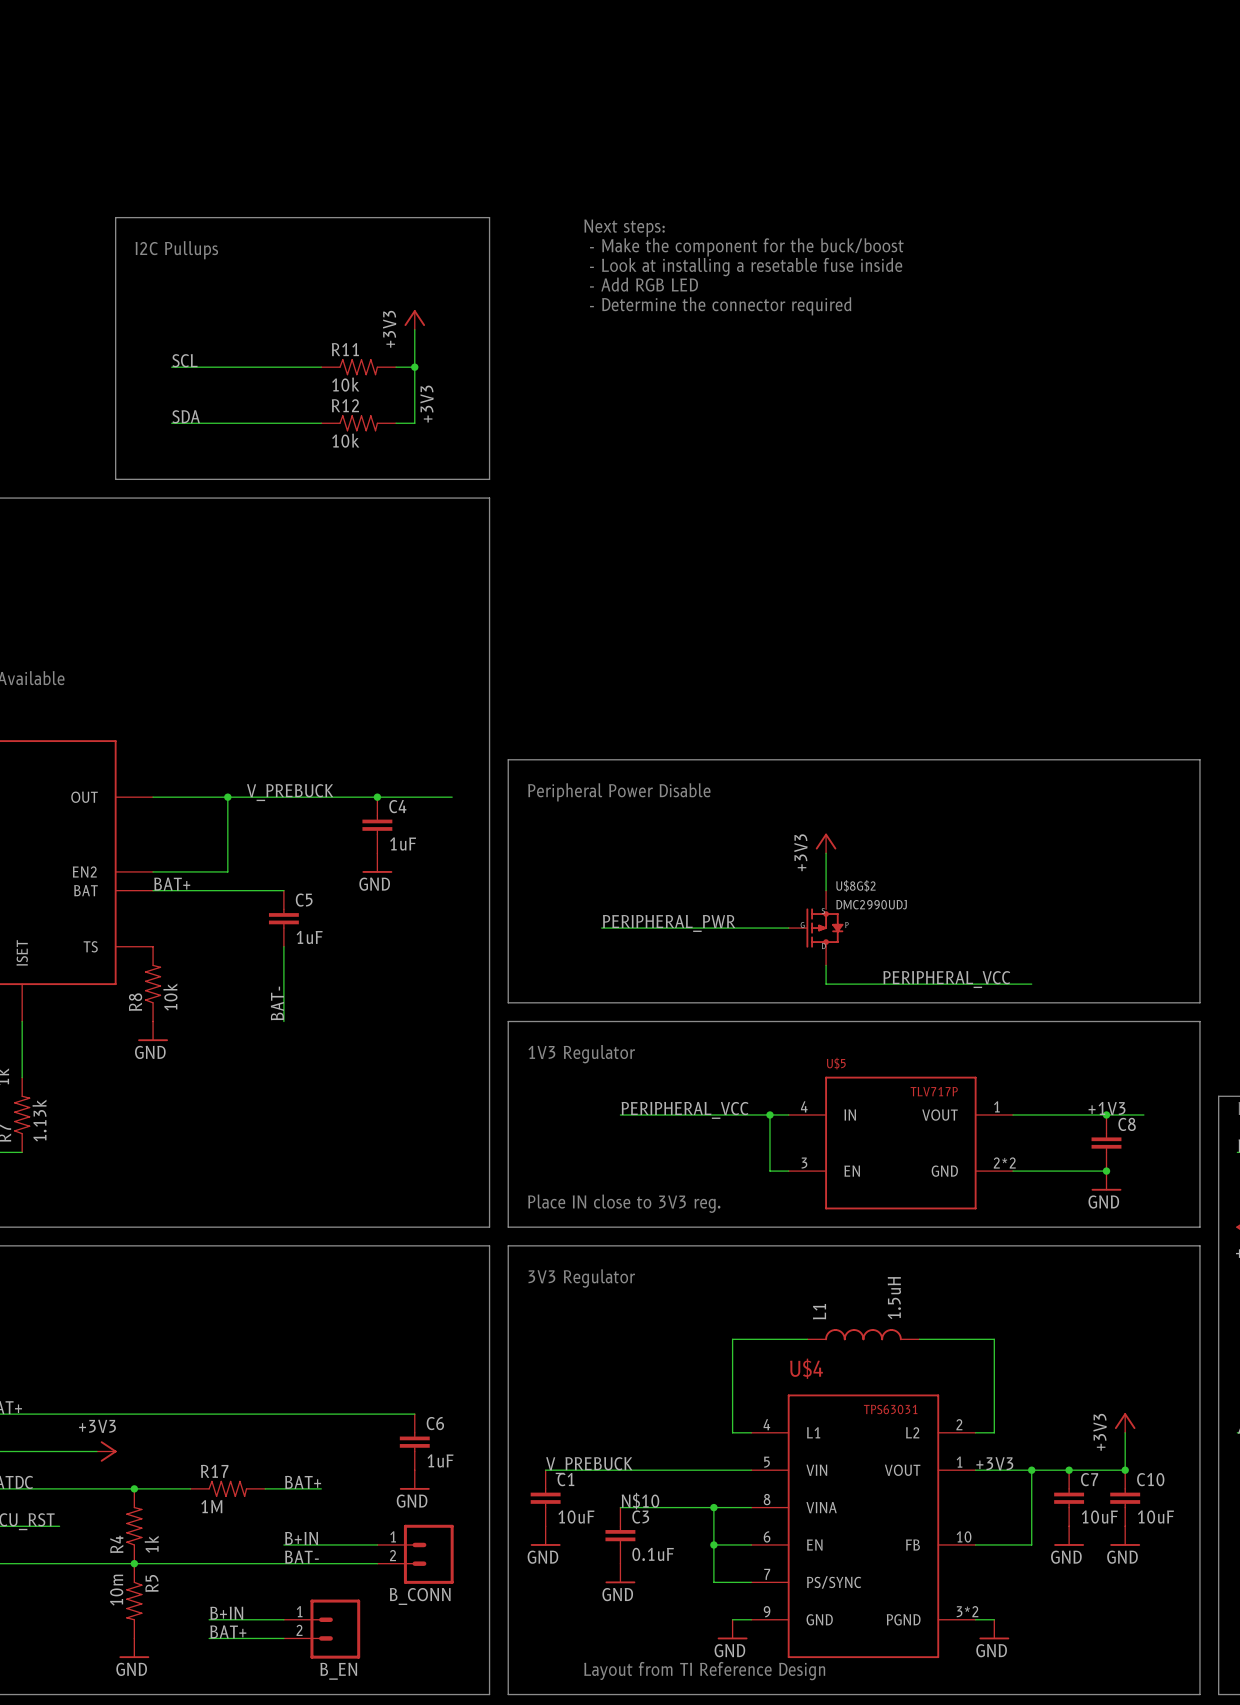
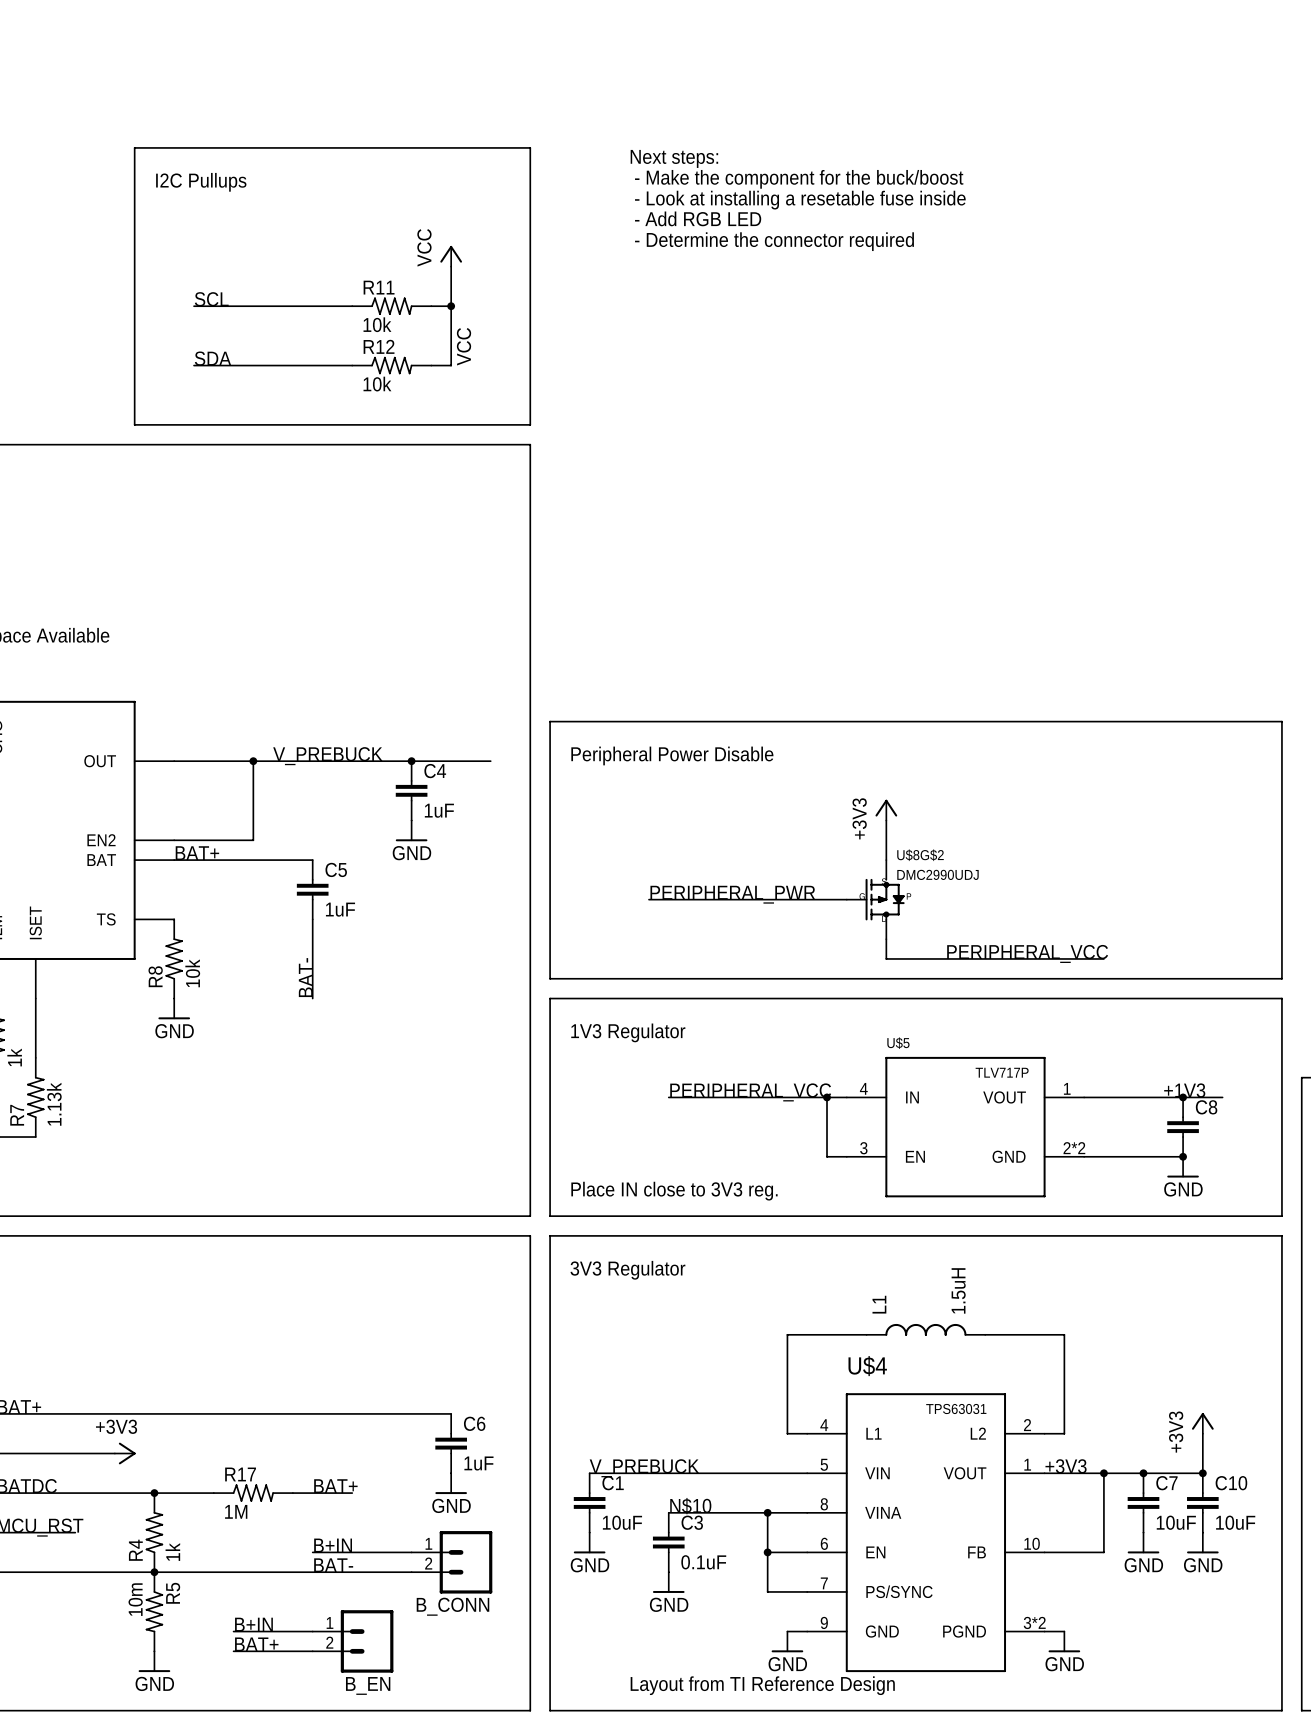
power symbol: +3V3 (414, 319) -> VCC (451, 256)
label: +3V3 (427, 404) -> VCC (464, 346)

